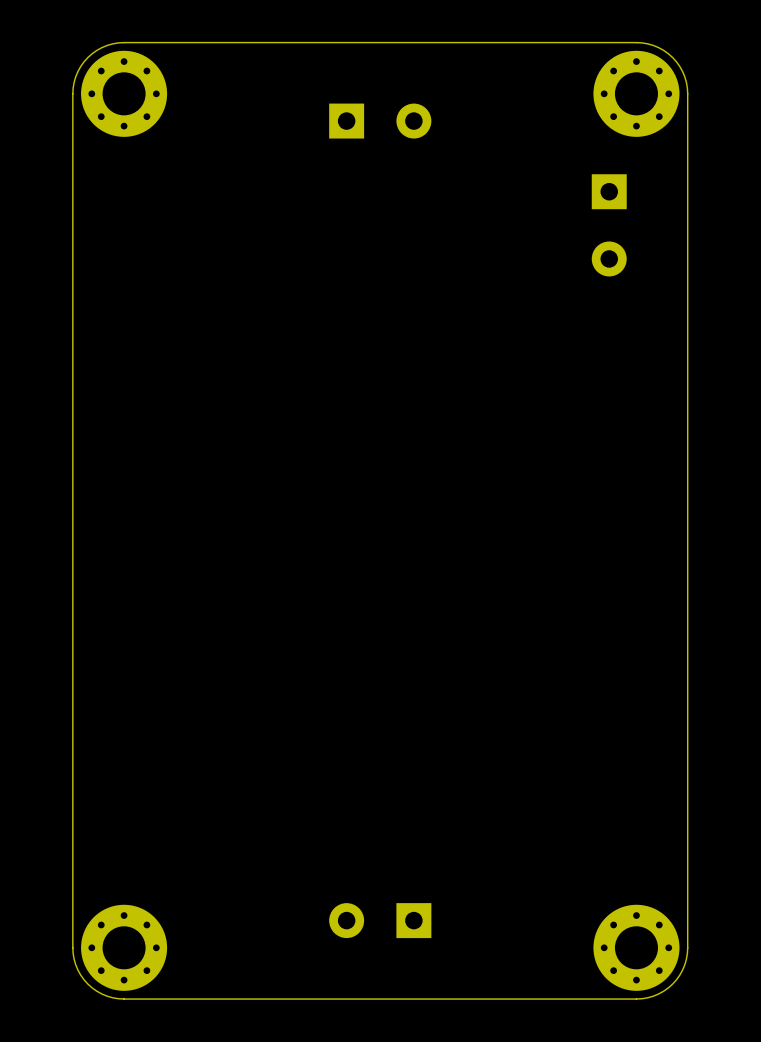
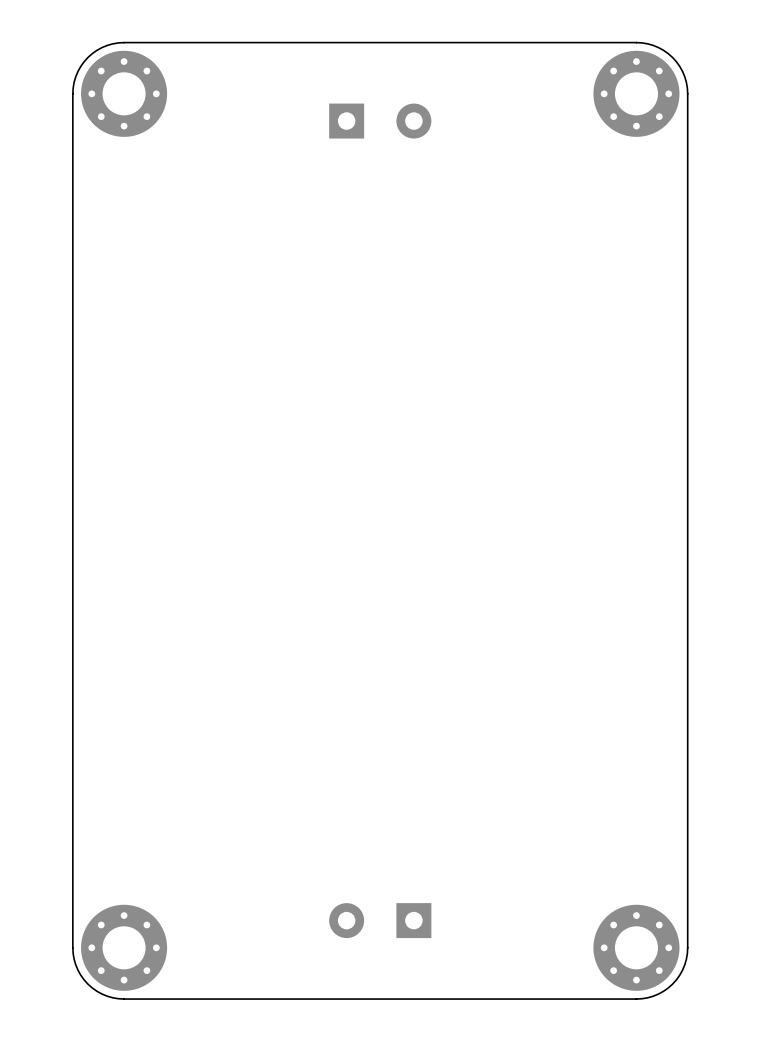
part: (609, 225) -> none

